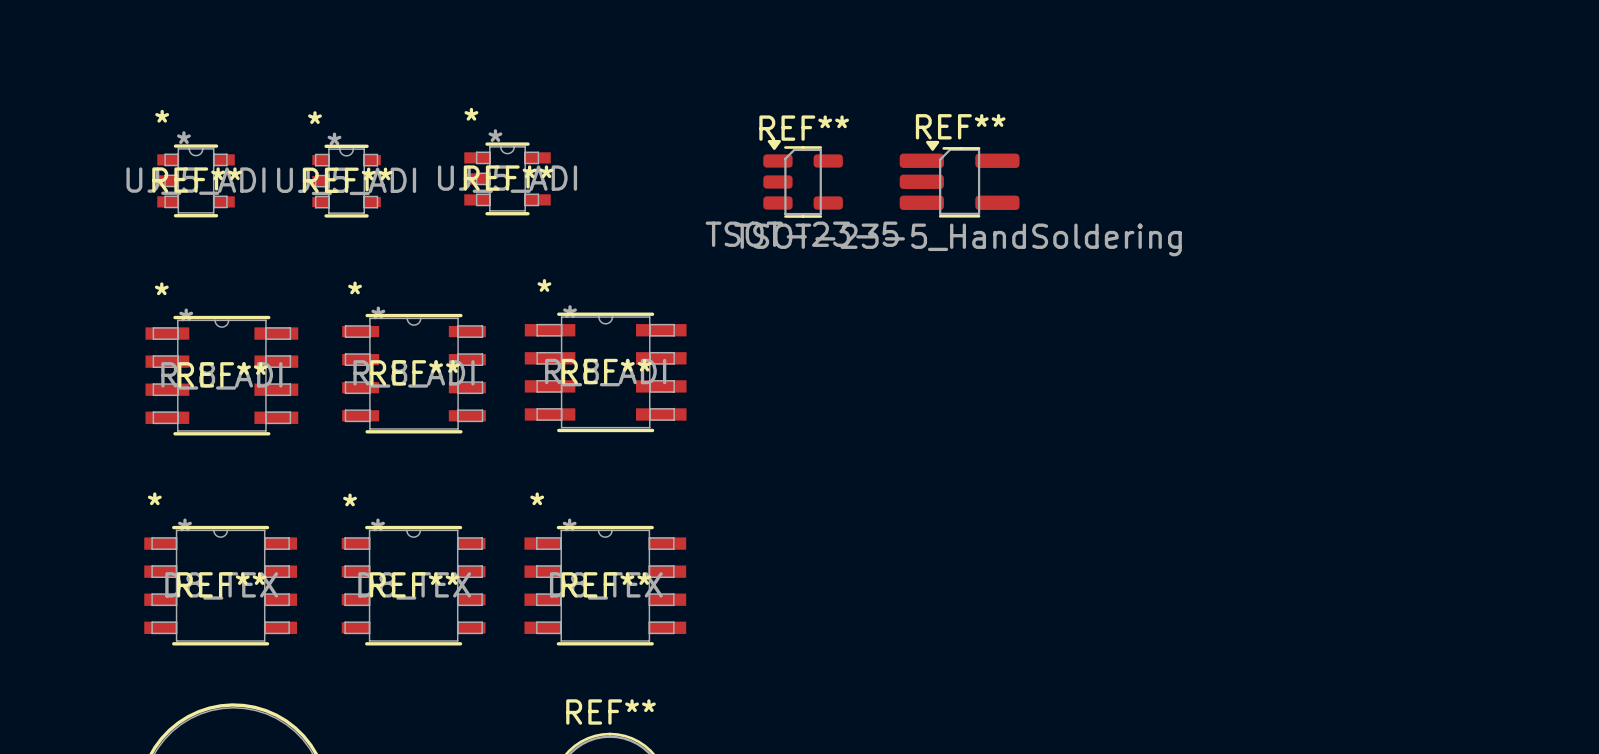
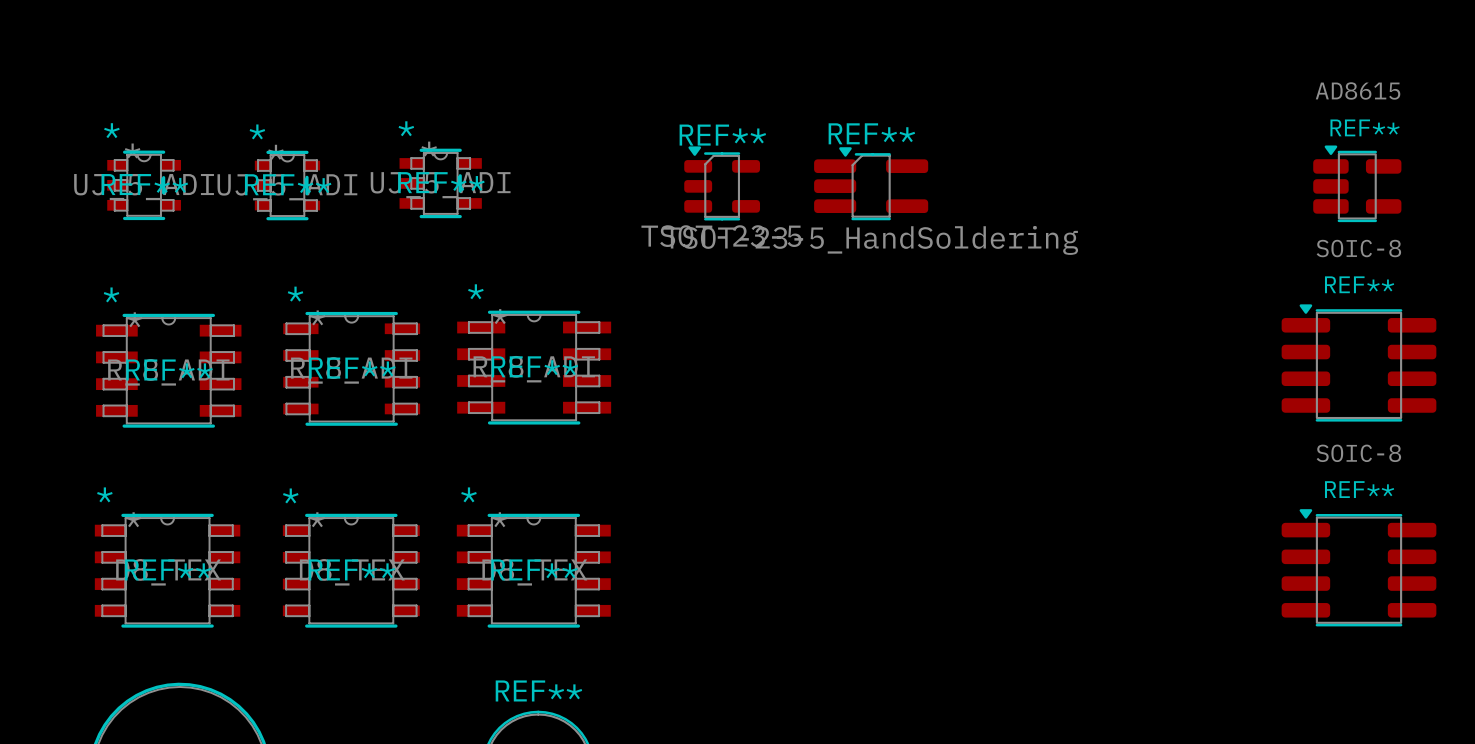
REF**: none -> AD8615 (1357, 183)
REF**: none -> SOIC-8 (1359, 362)
REF**: none -> SOIC-8 (1359, 567)

